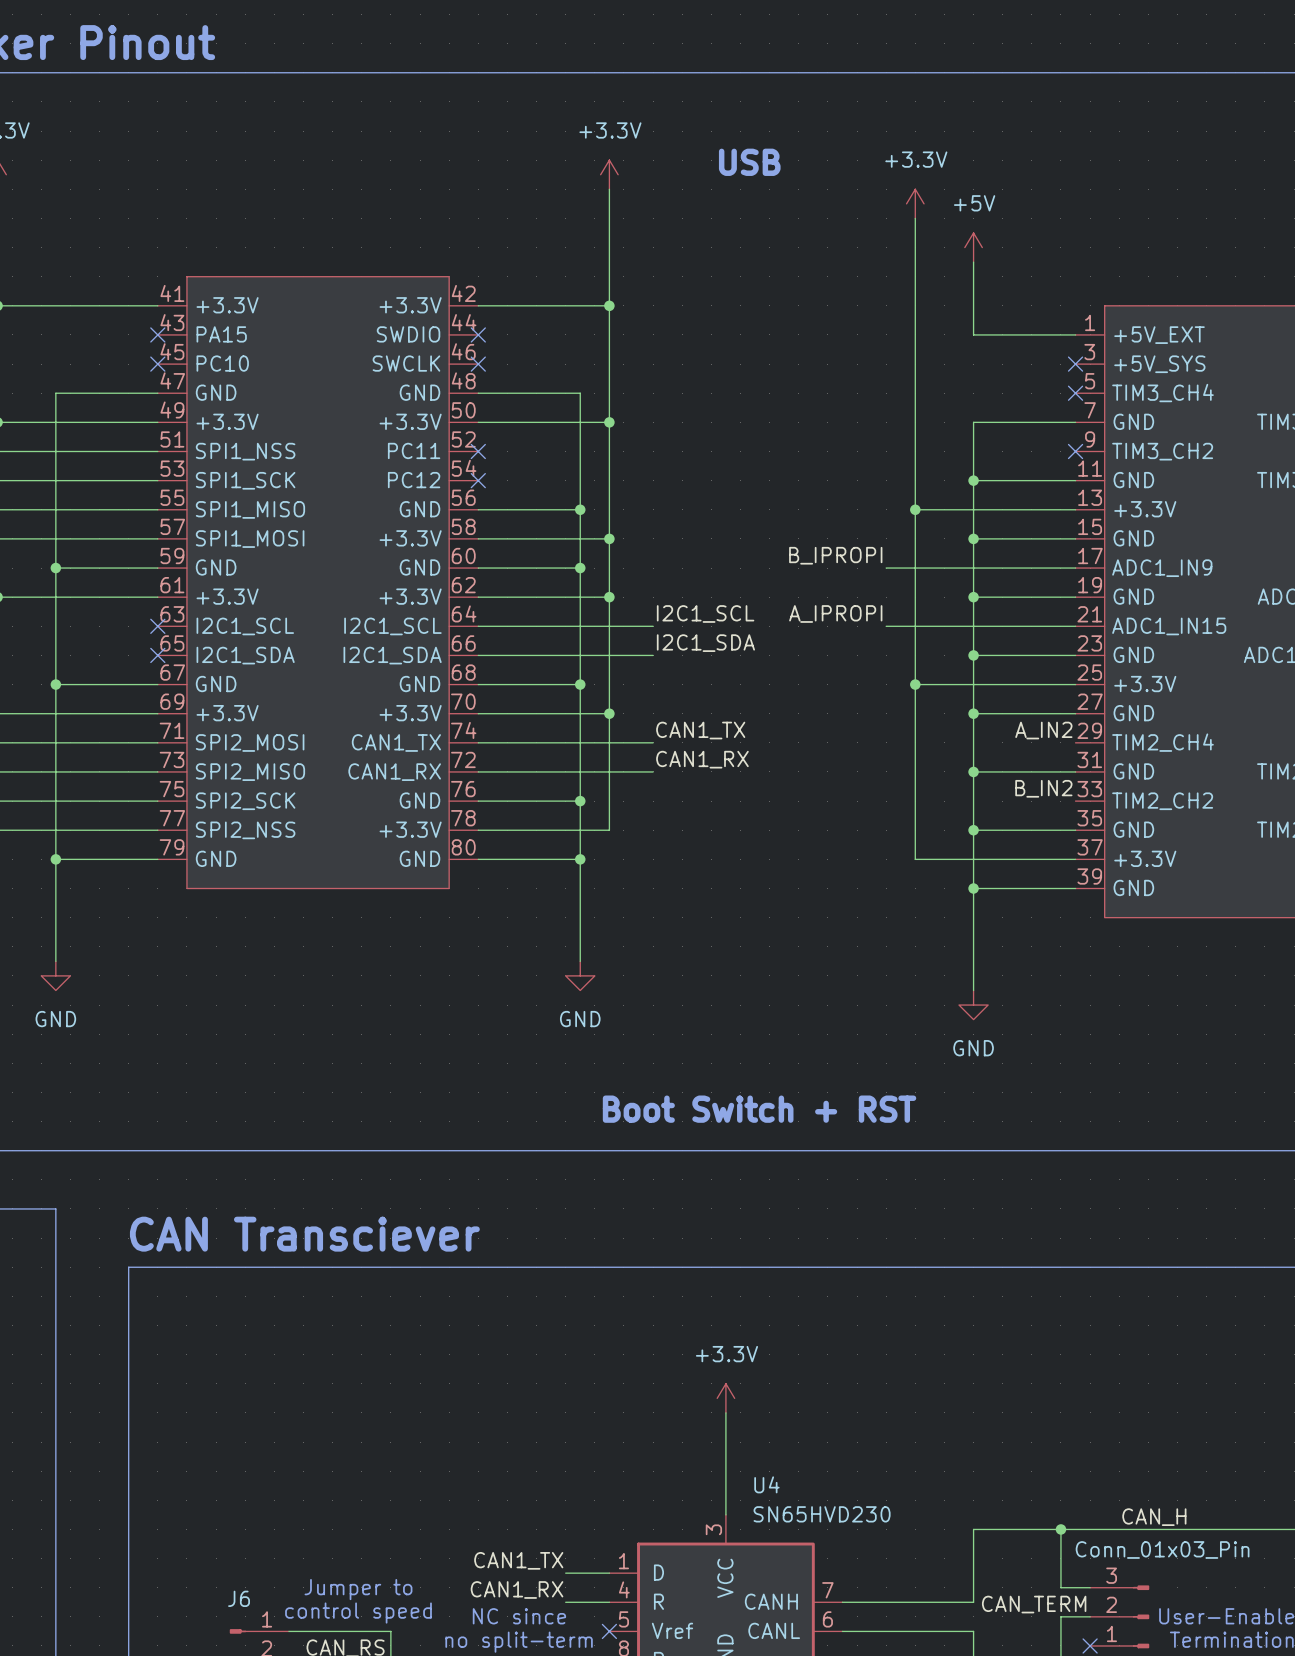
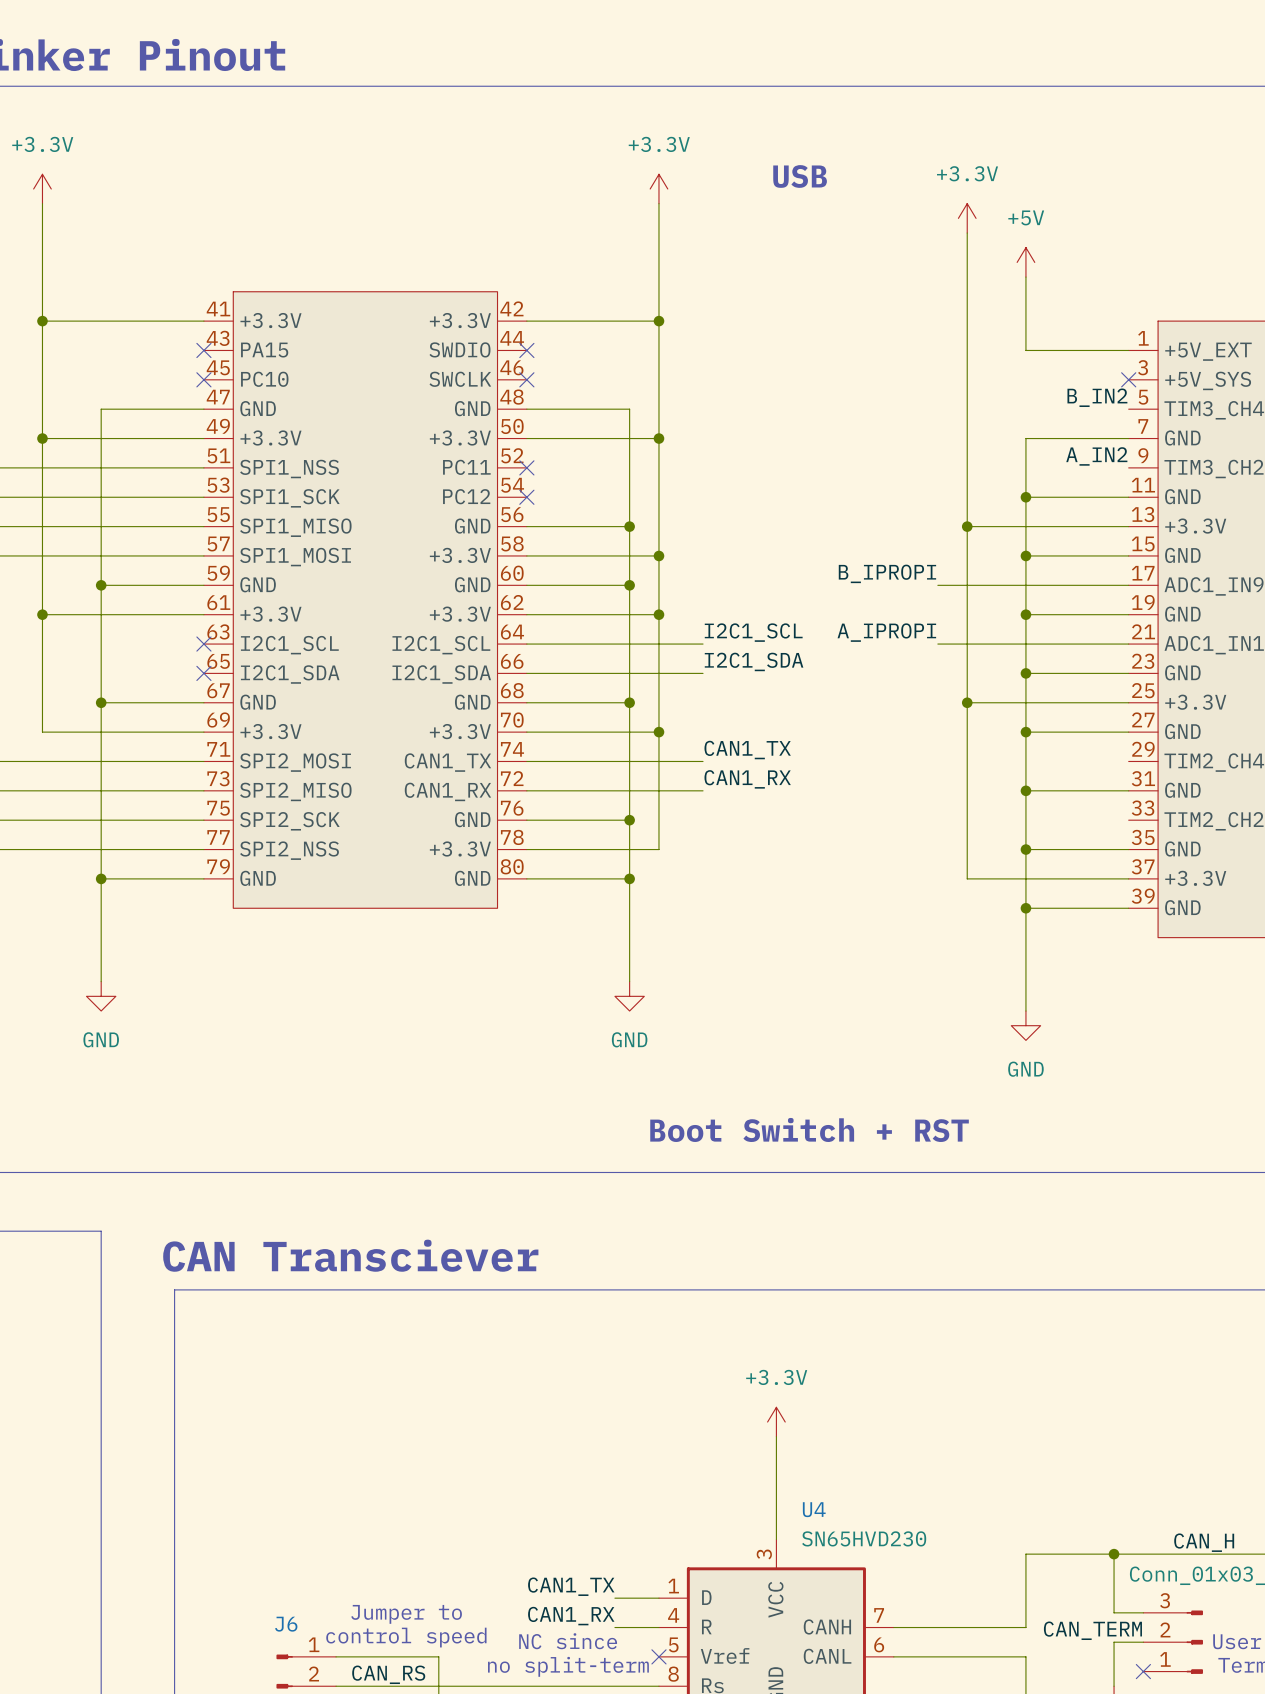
label: none -> B_IN2 (1097, 397)
no-connect mark: (1075, 393) -> none
label: none -> A_IN2 (1096, 456)
no-connect mark: (1075, 451) -> none
label: A_IN2 (1043, 730) -> none
label: B_IN2 (1043, 788) -> none

